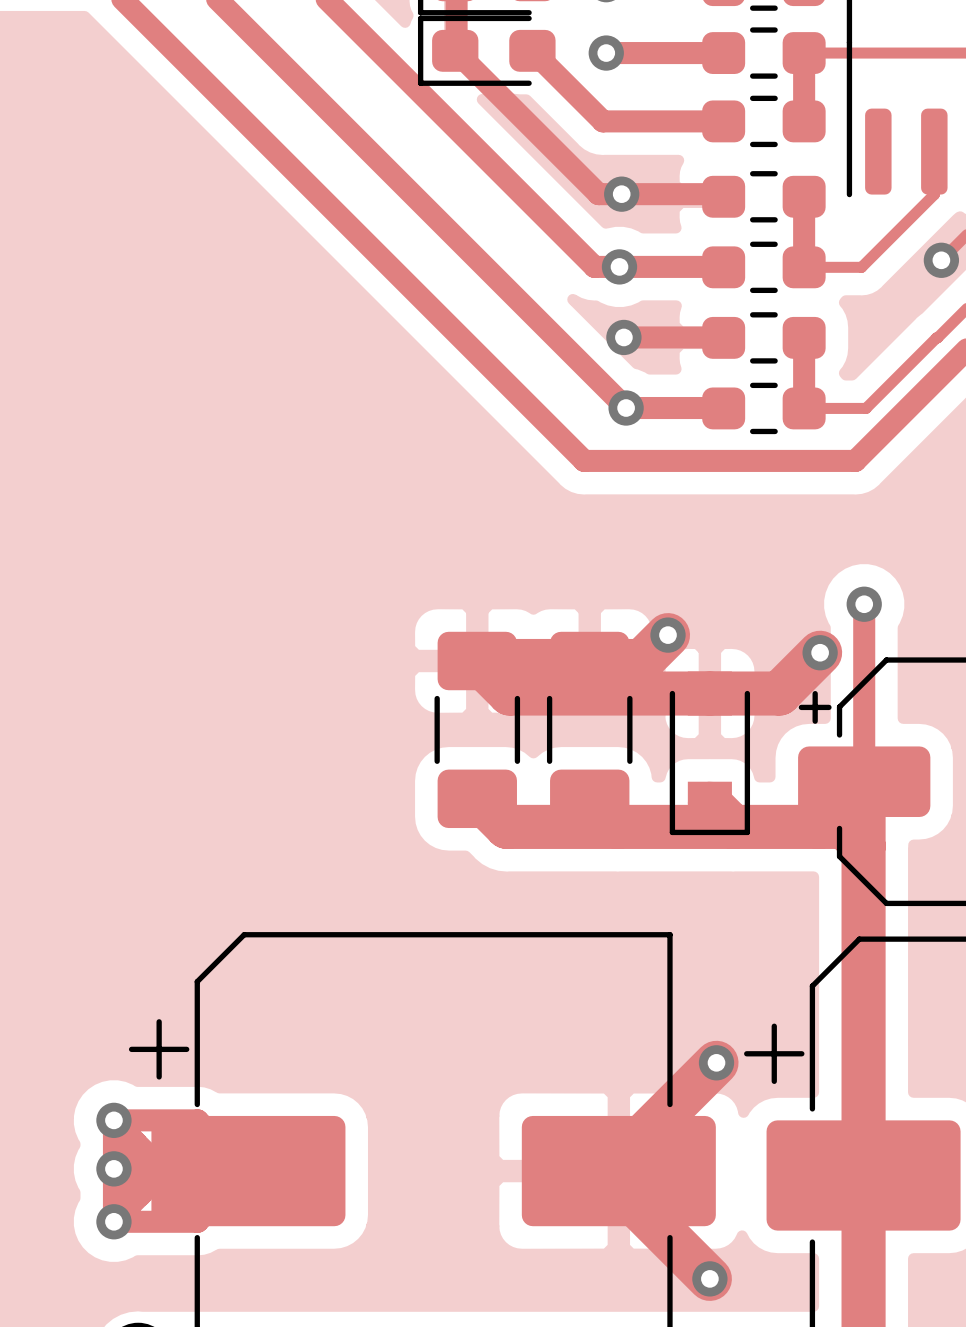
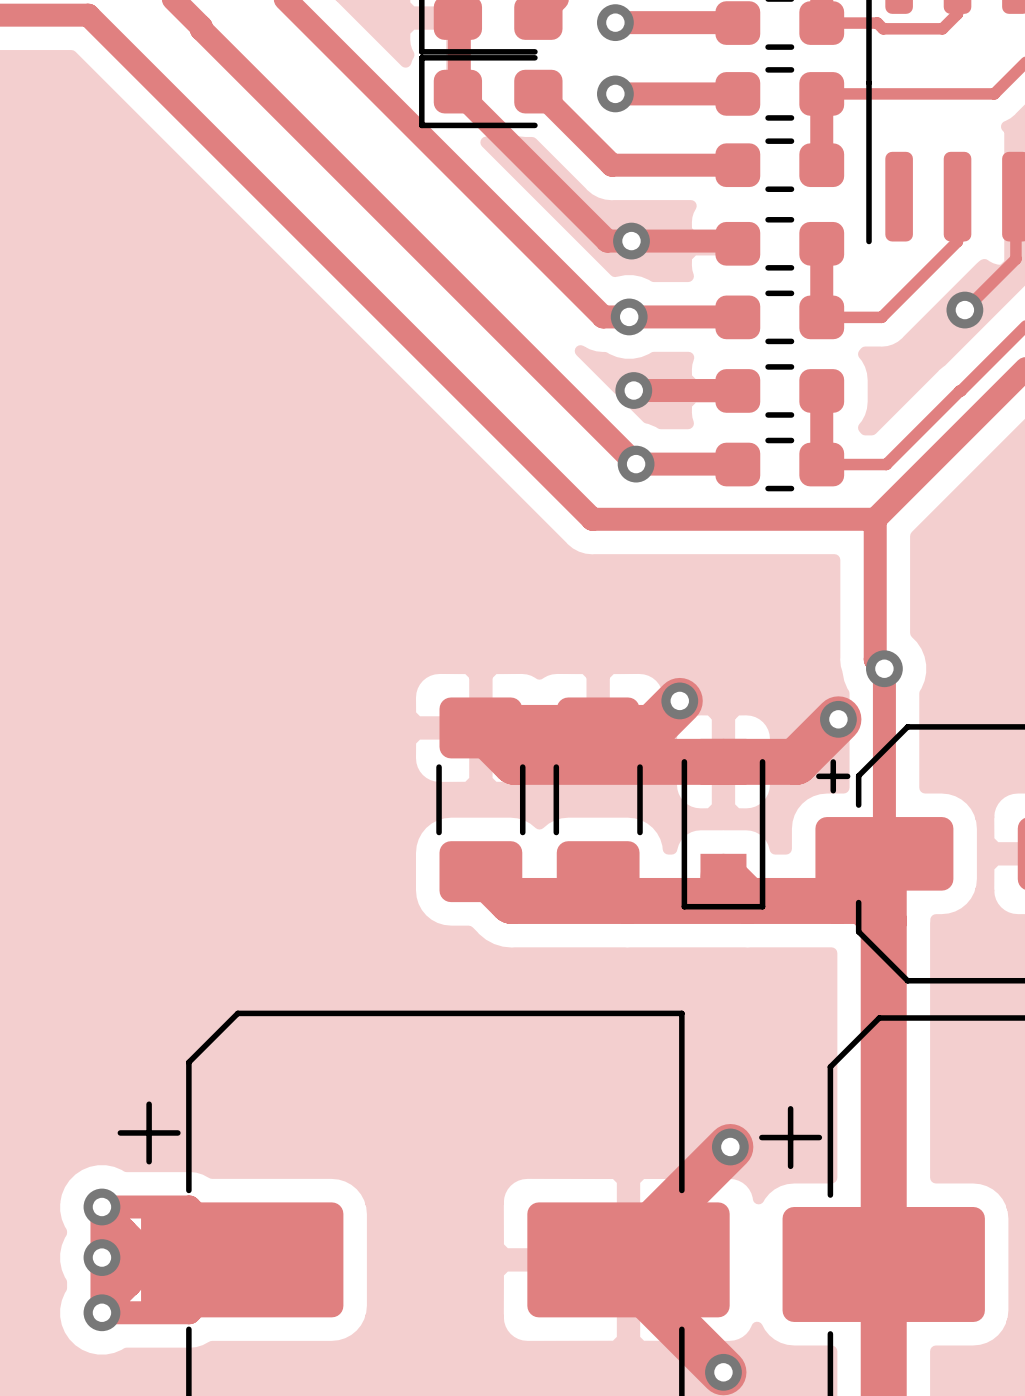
track: none -> (875, 519) (875, 659) (884, 668)

